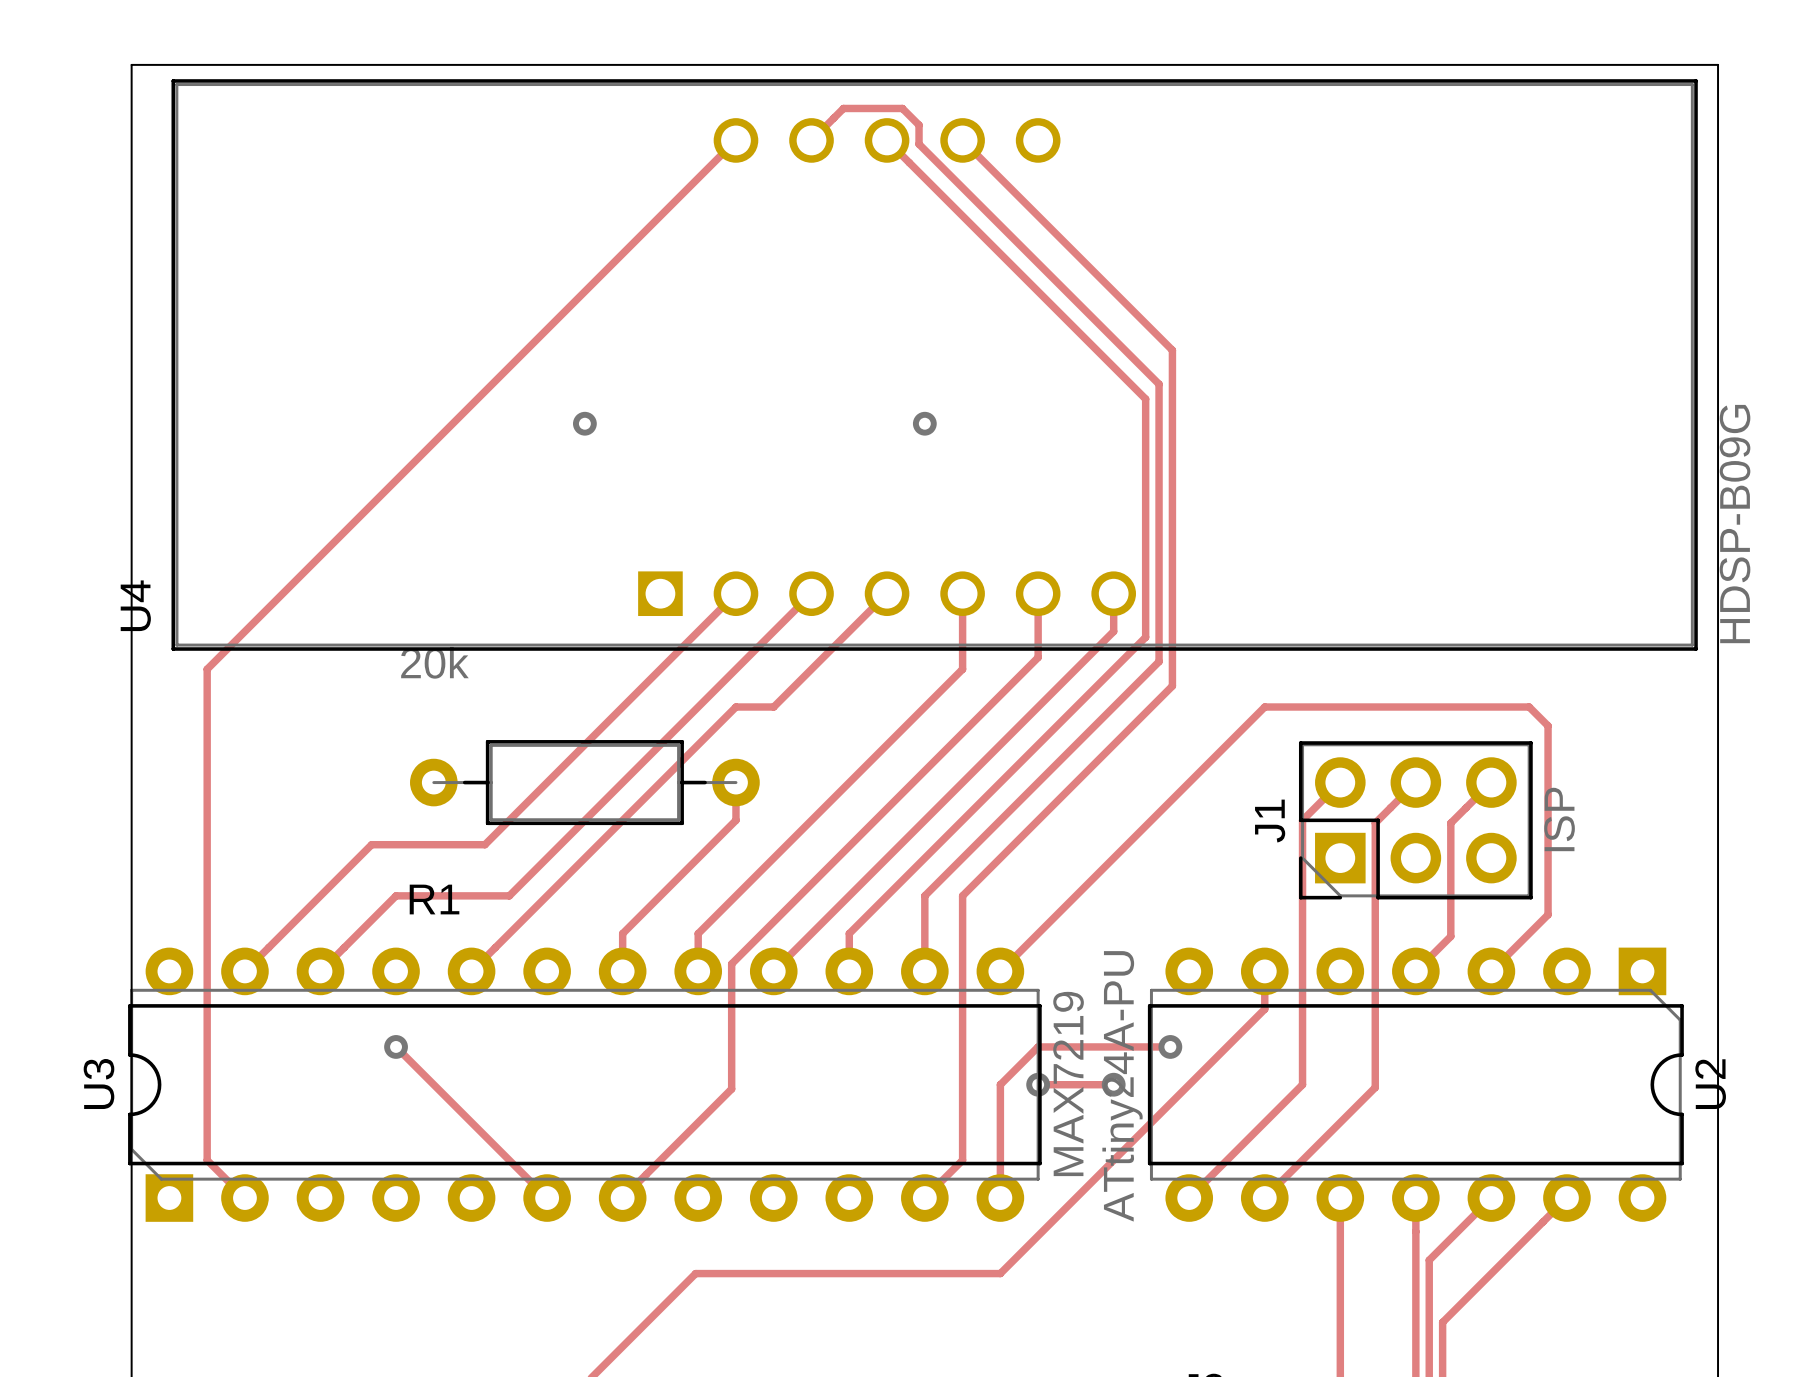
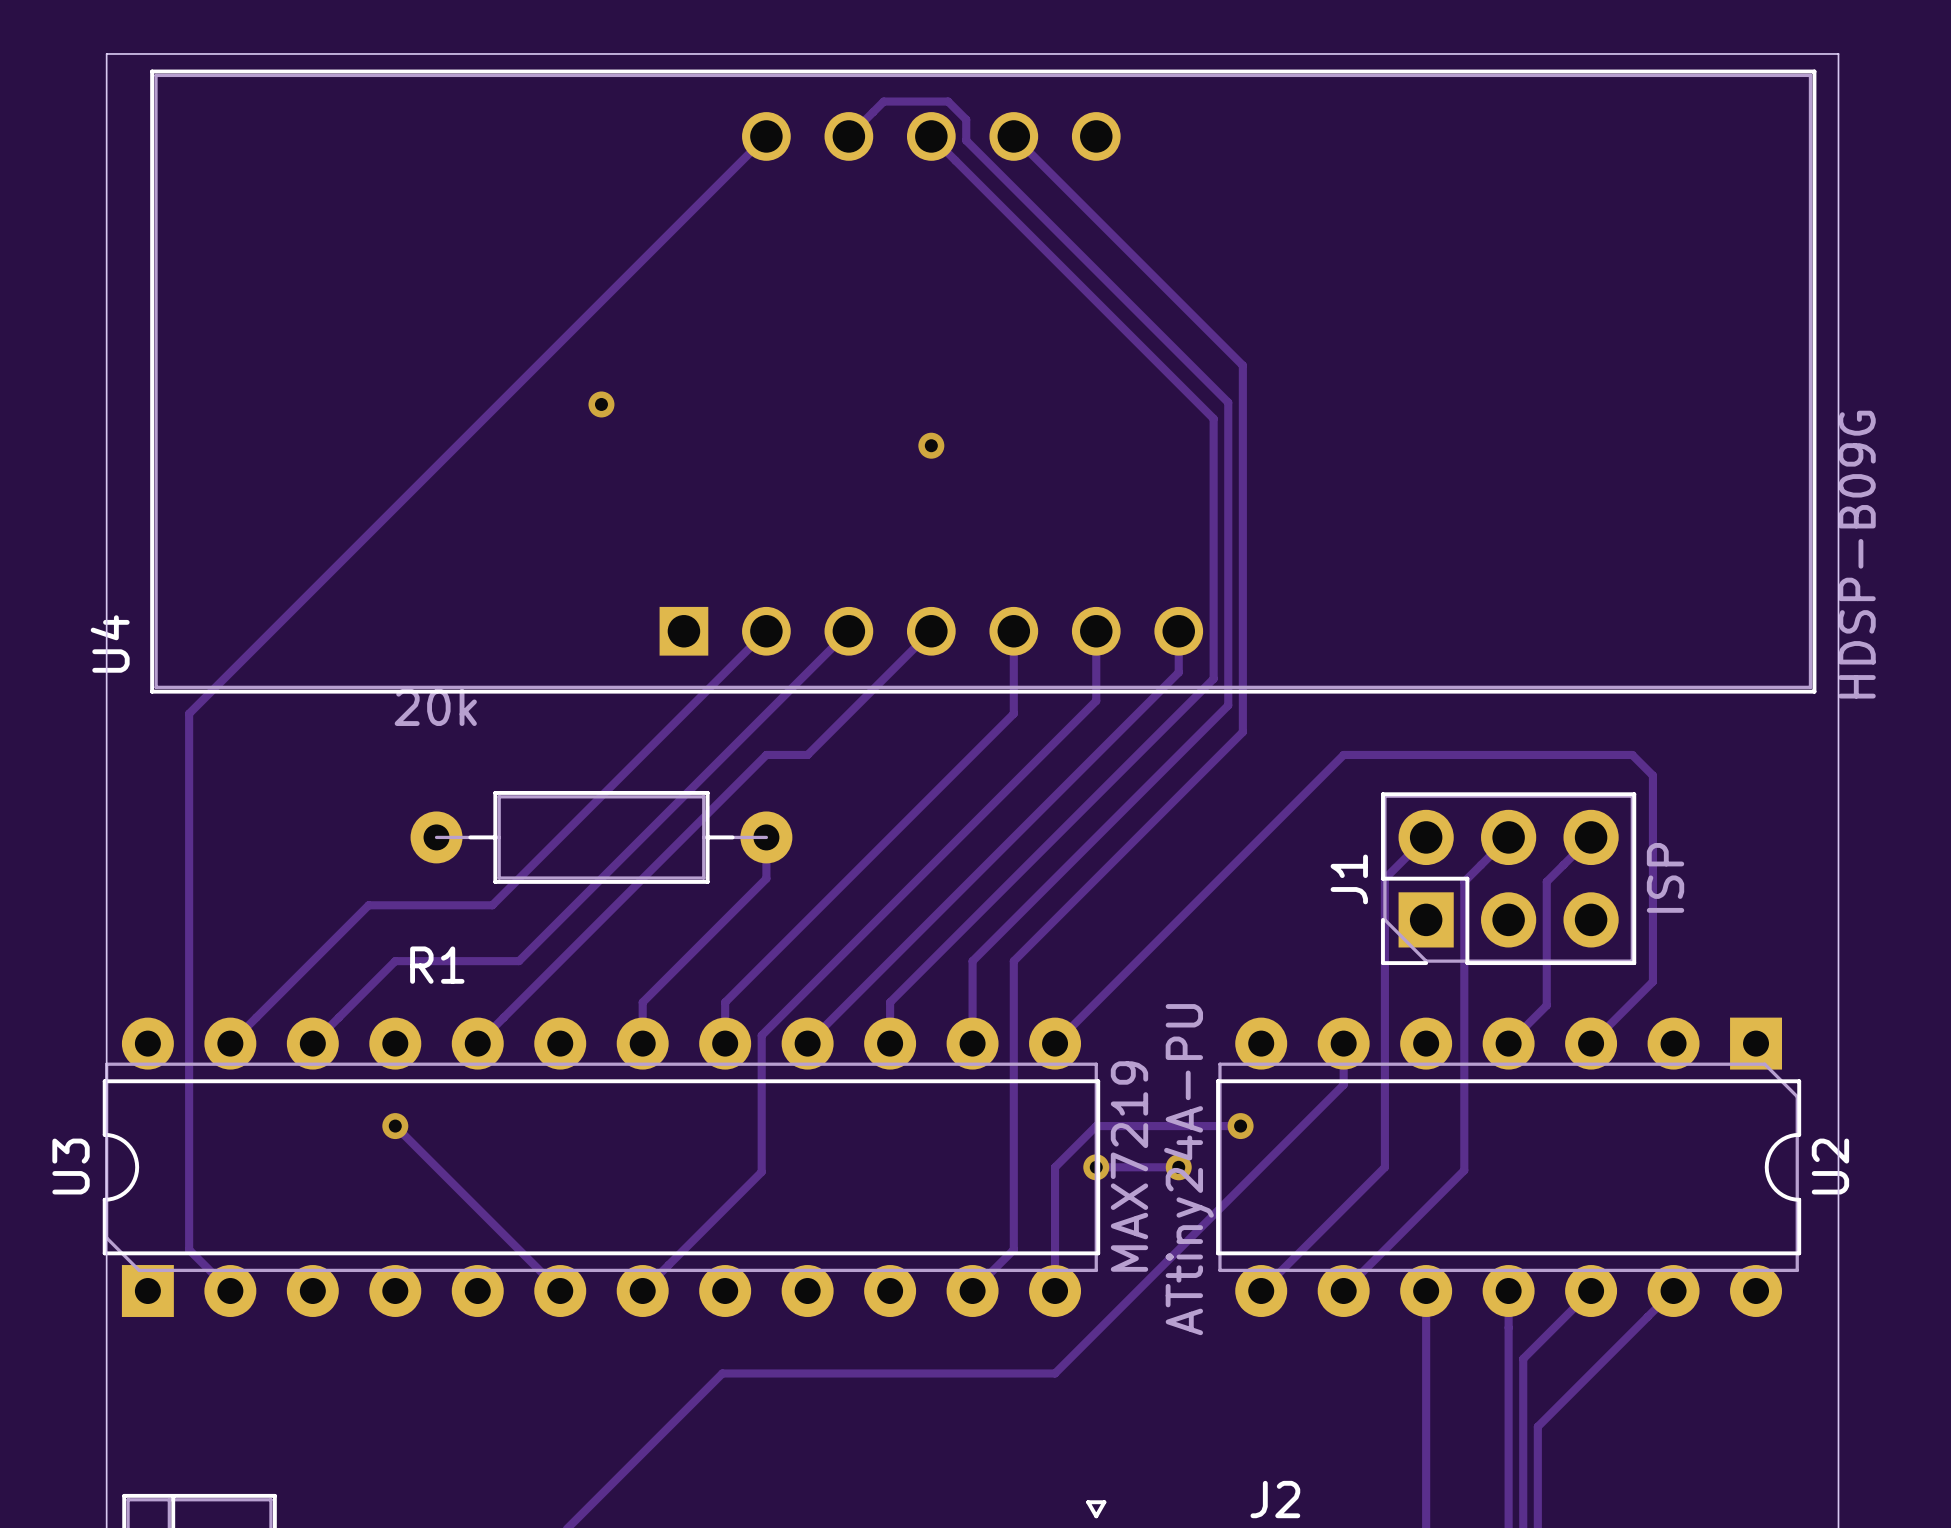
via position: (584, 423) -> (601, 404)
via position: (924, 423) -> (931, 445)

